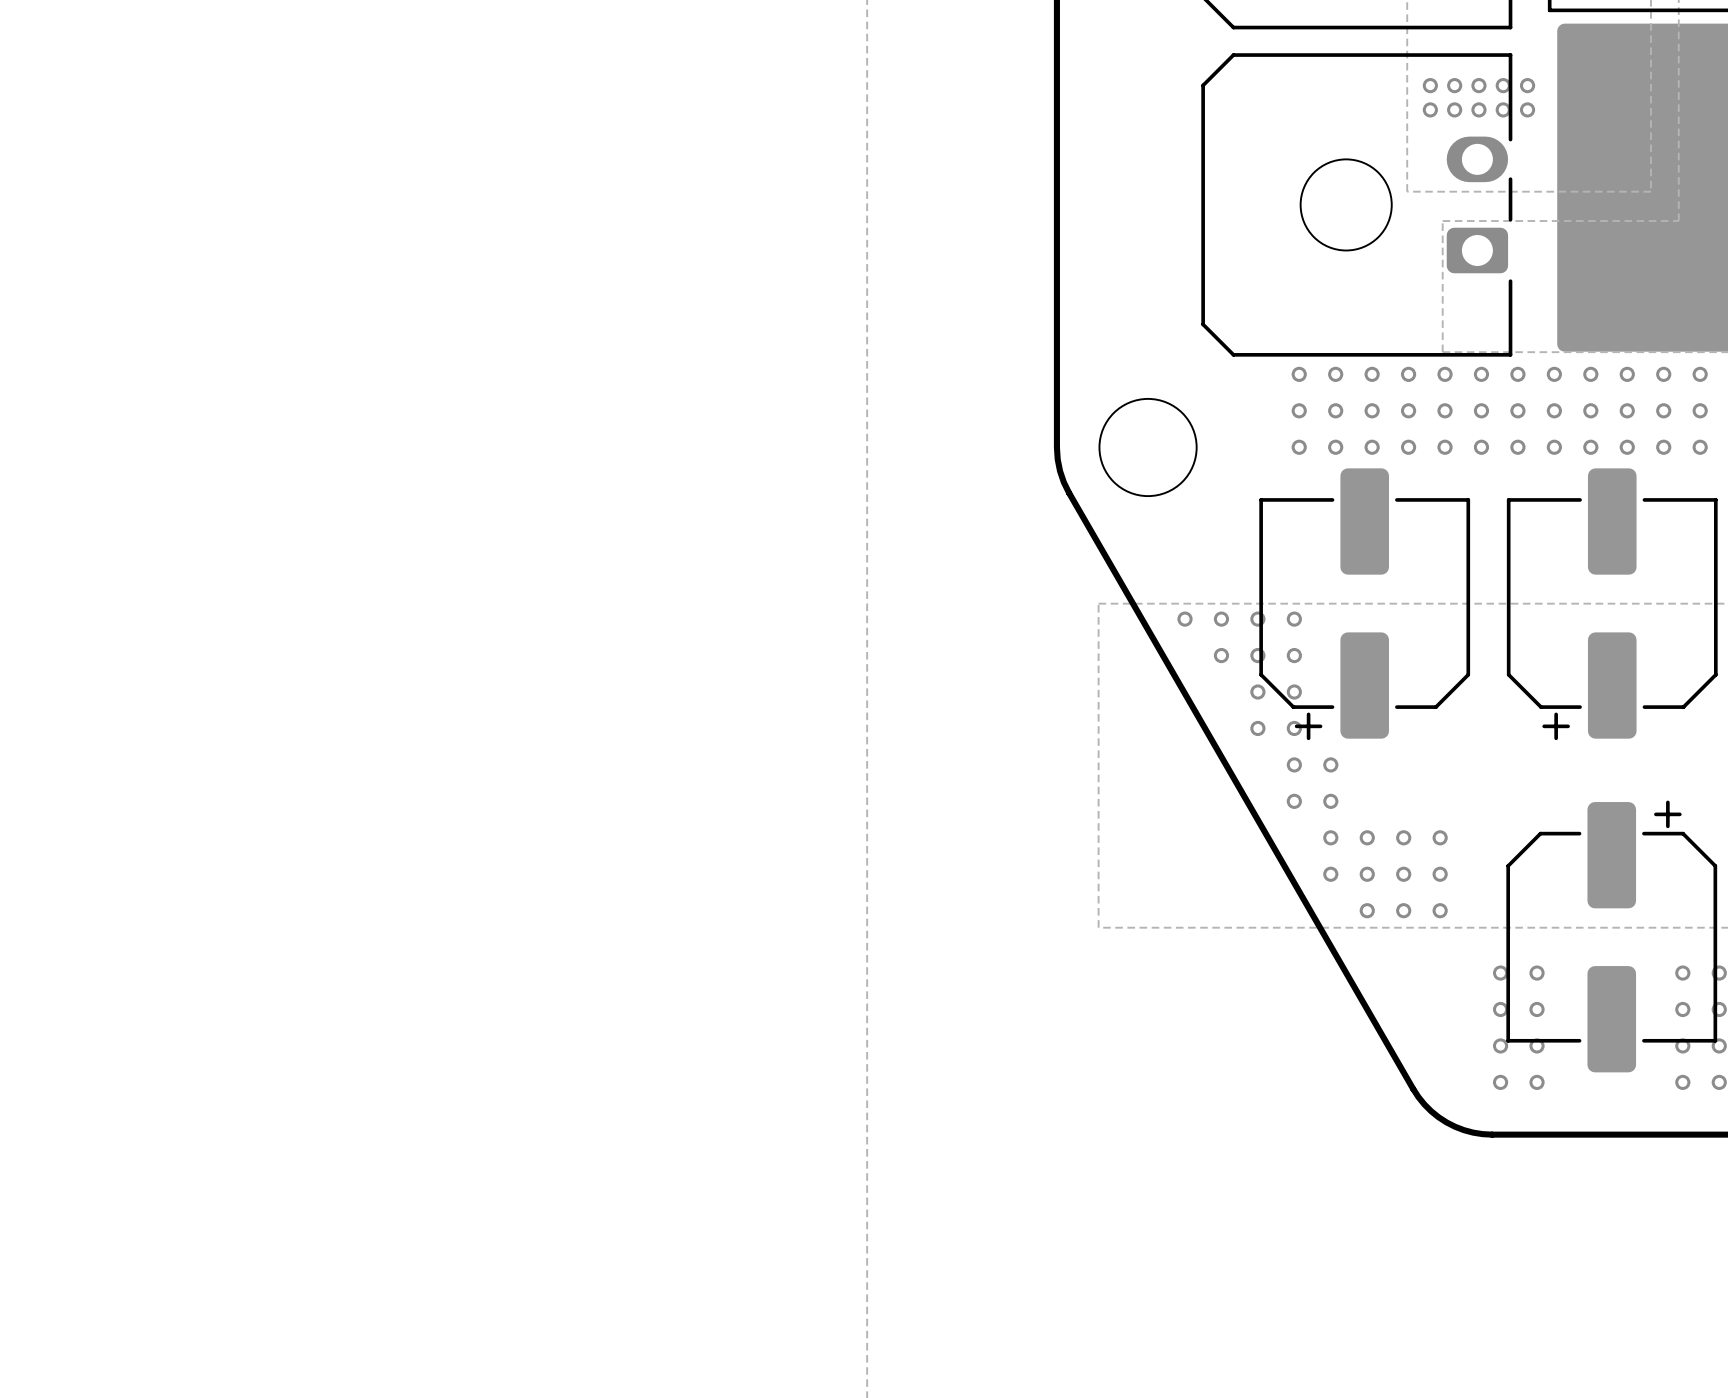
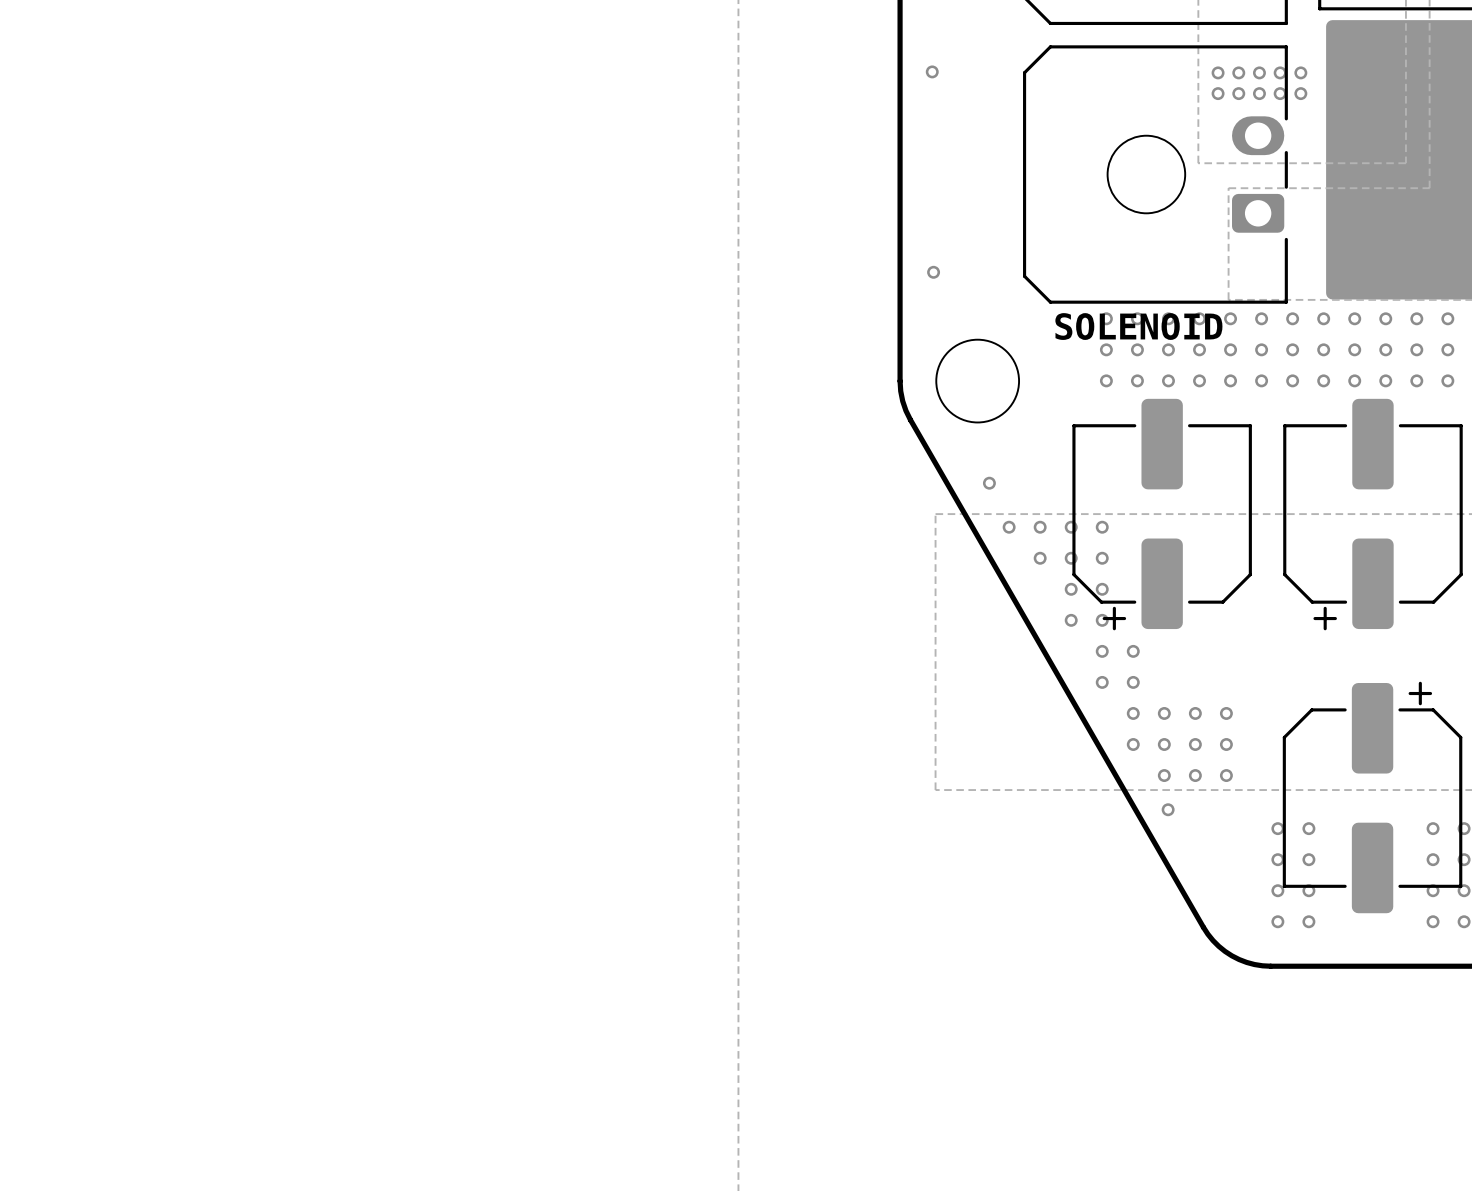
via: none -> (932, 71)
via: none -> (933, 272)
text: none -> SOLENOID (1138, 326)
via: none -> (989, 483)
via: none -> (1168, 809)

